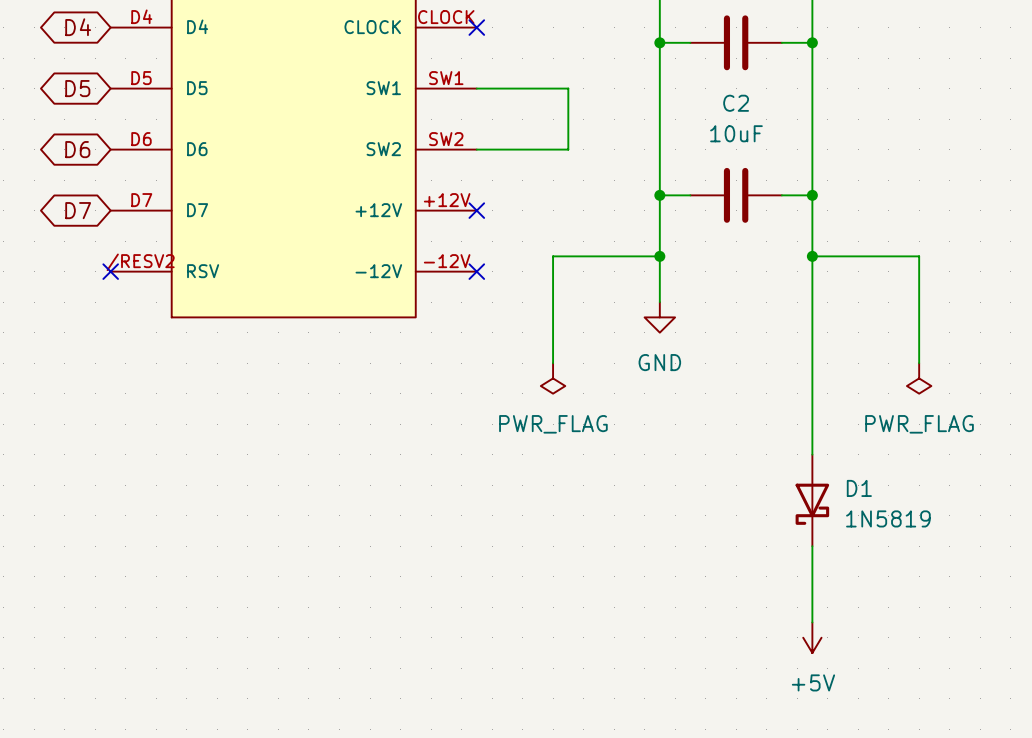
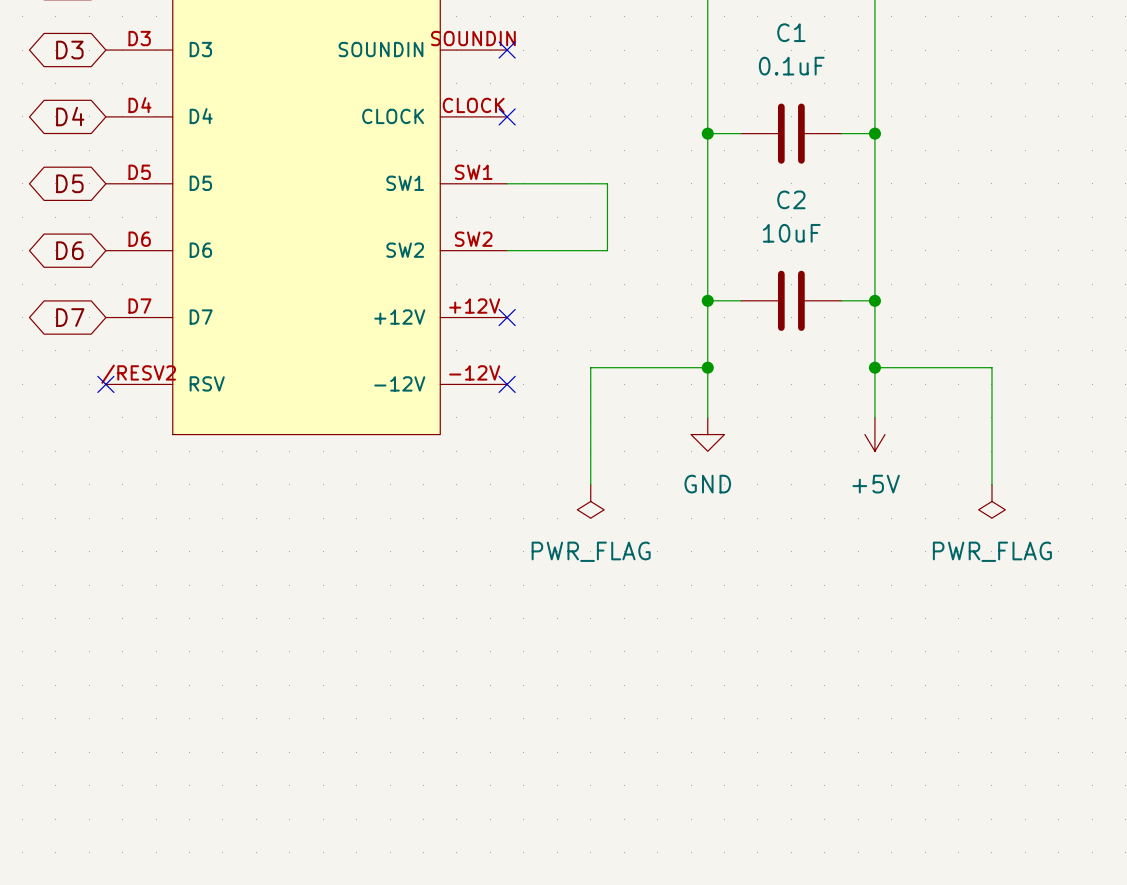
wire: (812, 302) (812, 454) -> none
power symbol: none -> +5V (874, 434)
D1: 1N5819 (812, 500) -> none
wire: (812, 546) (812, 622) -> none
power symbol: +5V (812, 637) -> none

